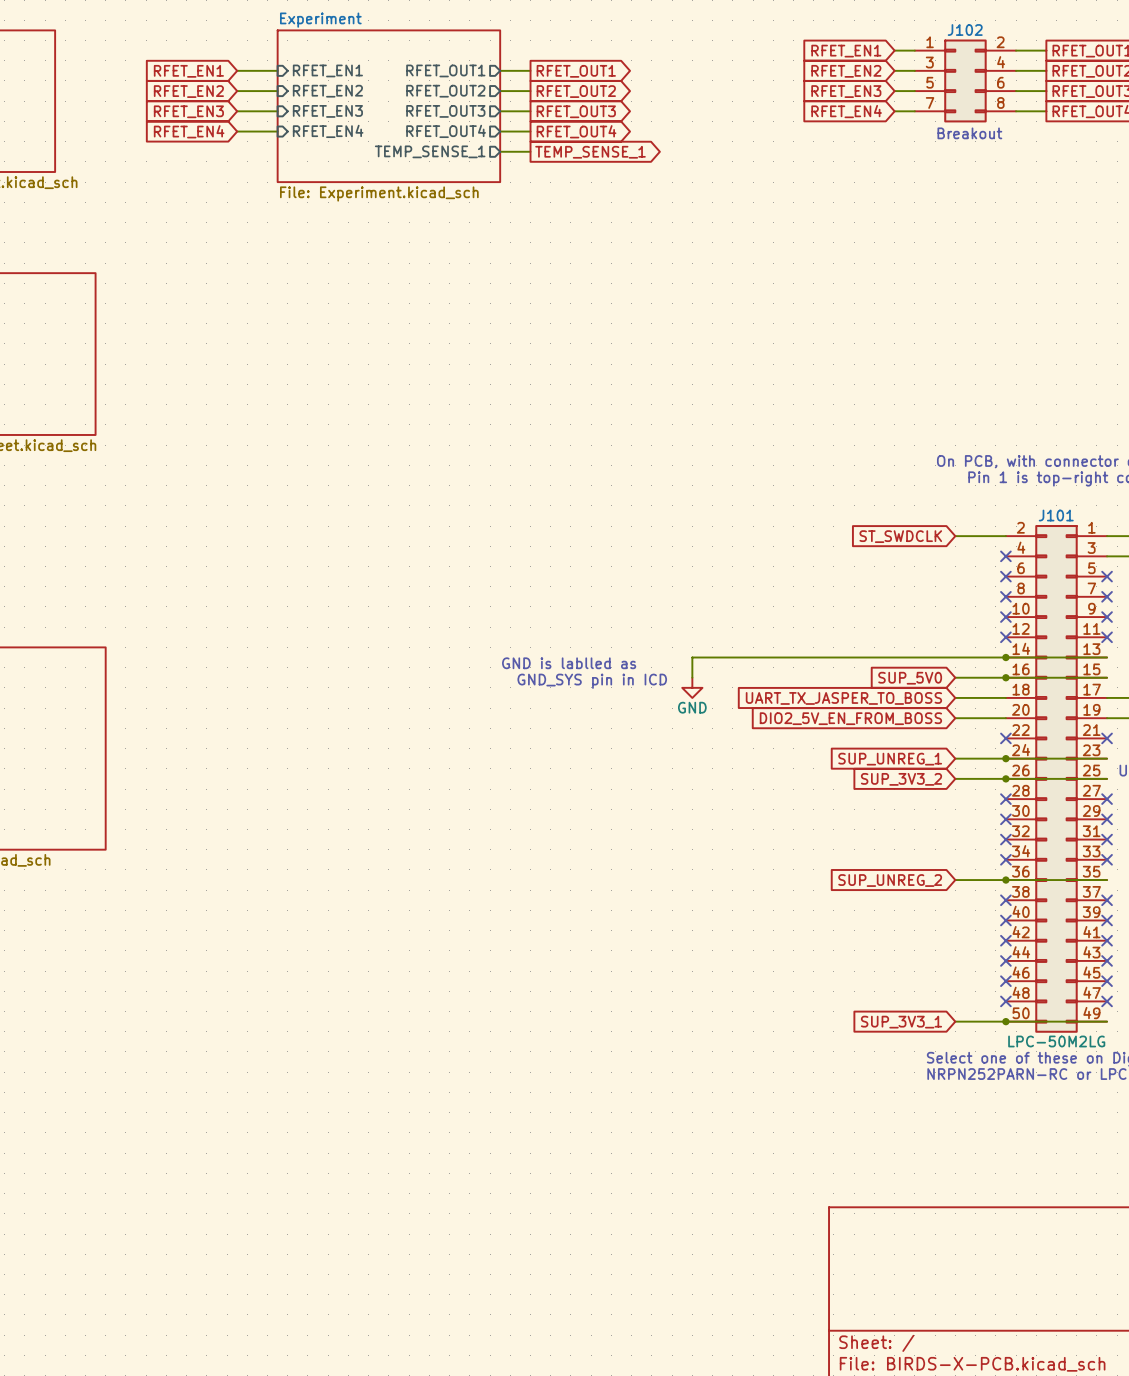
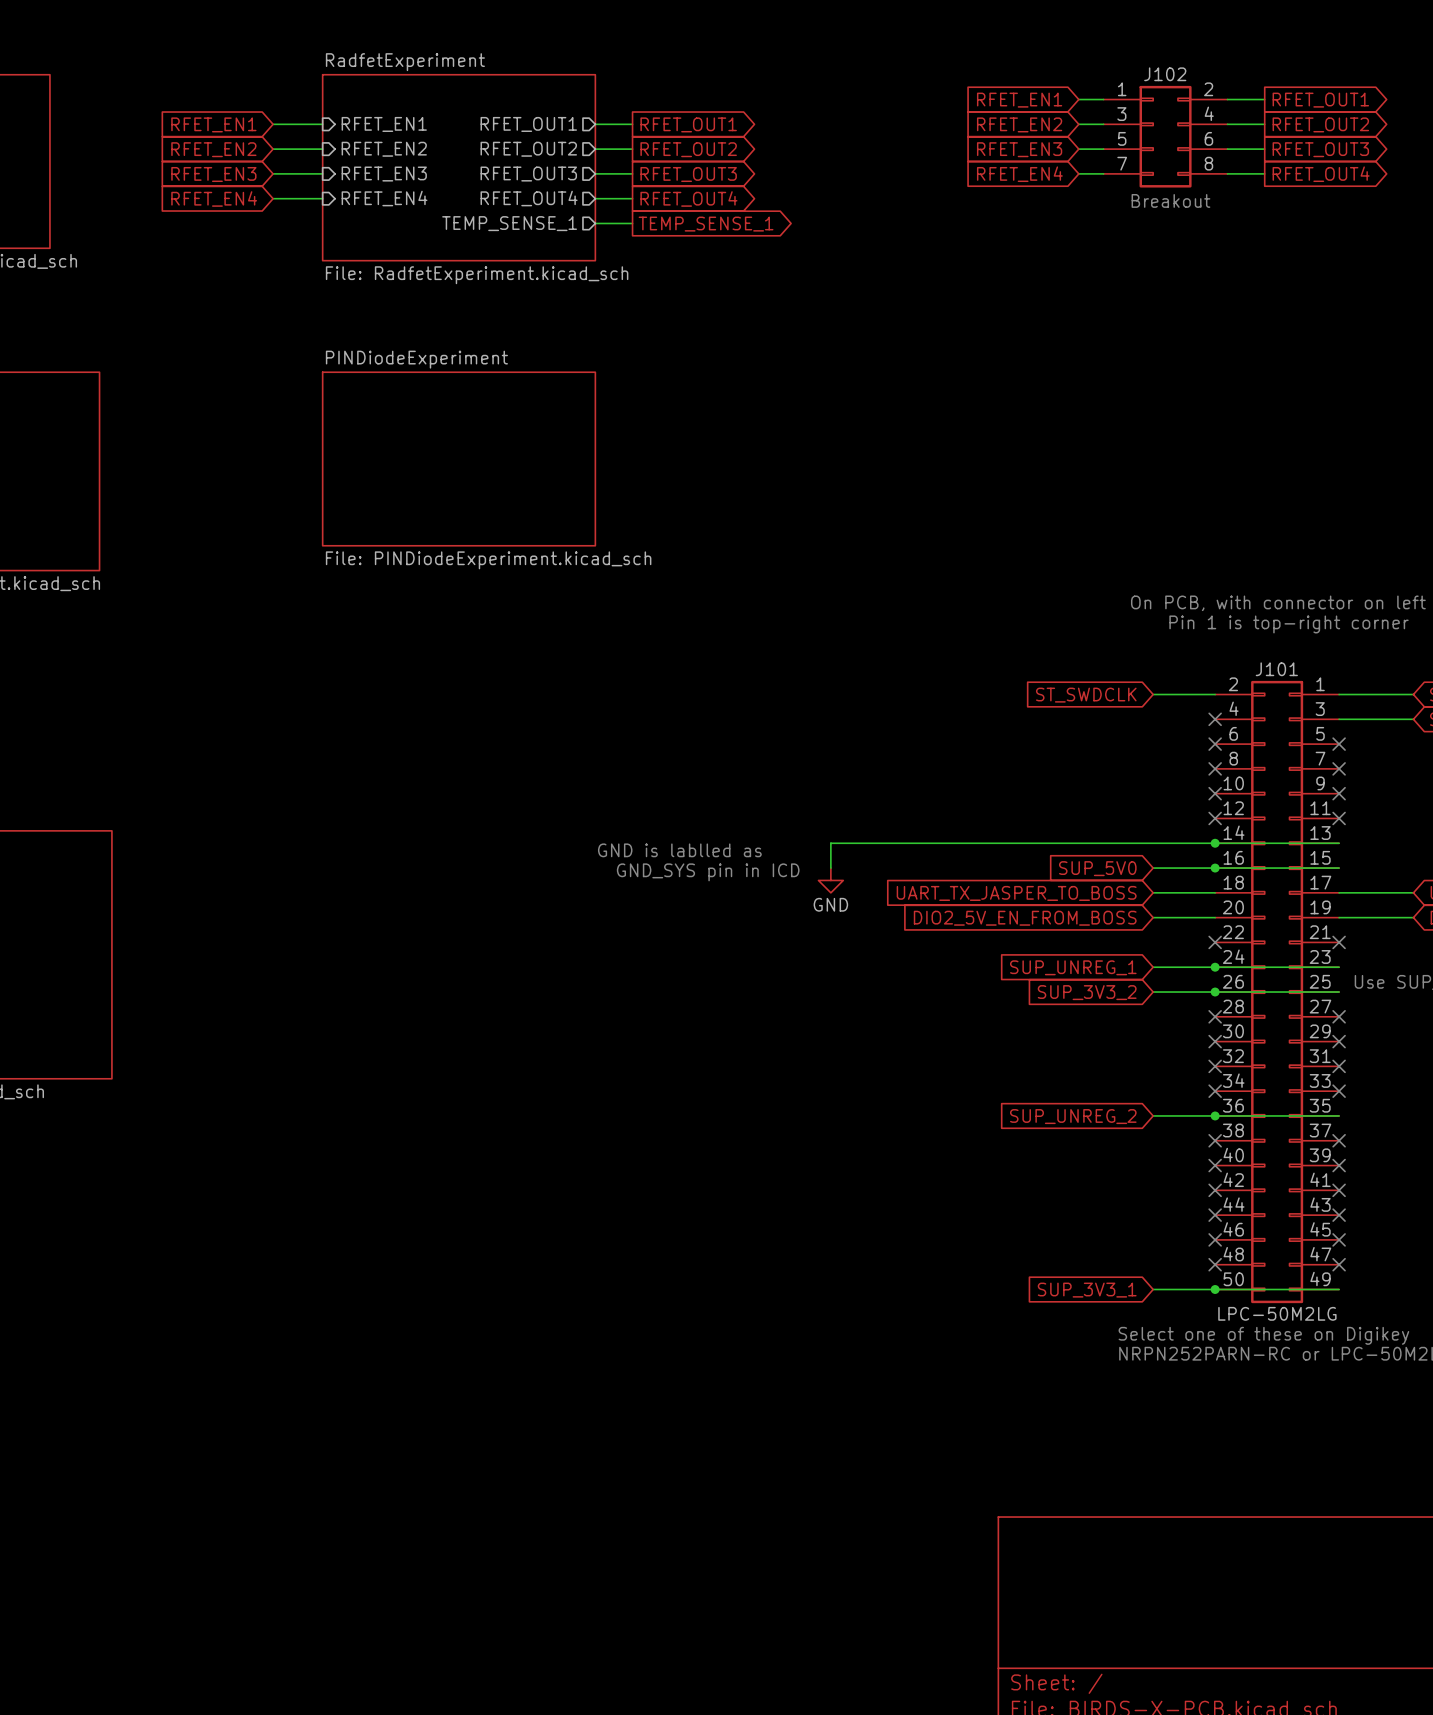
sheet Experiment name: Experiment (320, 20) -> RadfetExperiment (405, 62)
sheet Experiment value: File: Experiment.kicad_sch (379, 193) -> File: RadfetExperiment.kicad_sch (477, 275)
sheet PINDiodeExperiment: none -> File: PINDiodeExperiment.kicad_sch (459, 459)

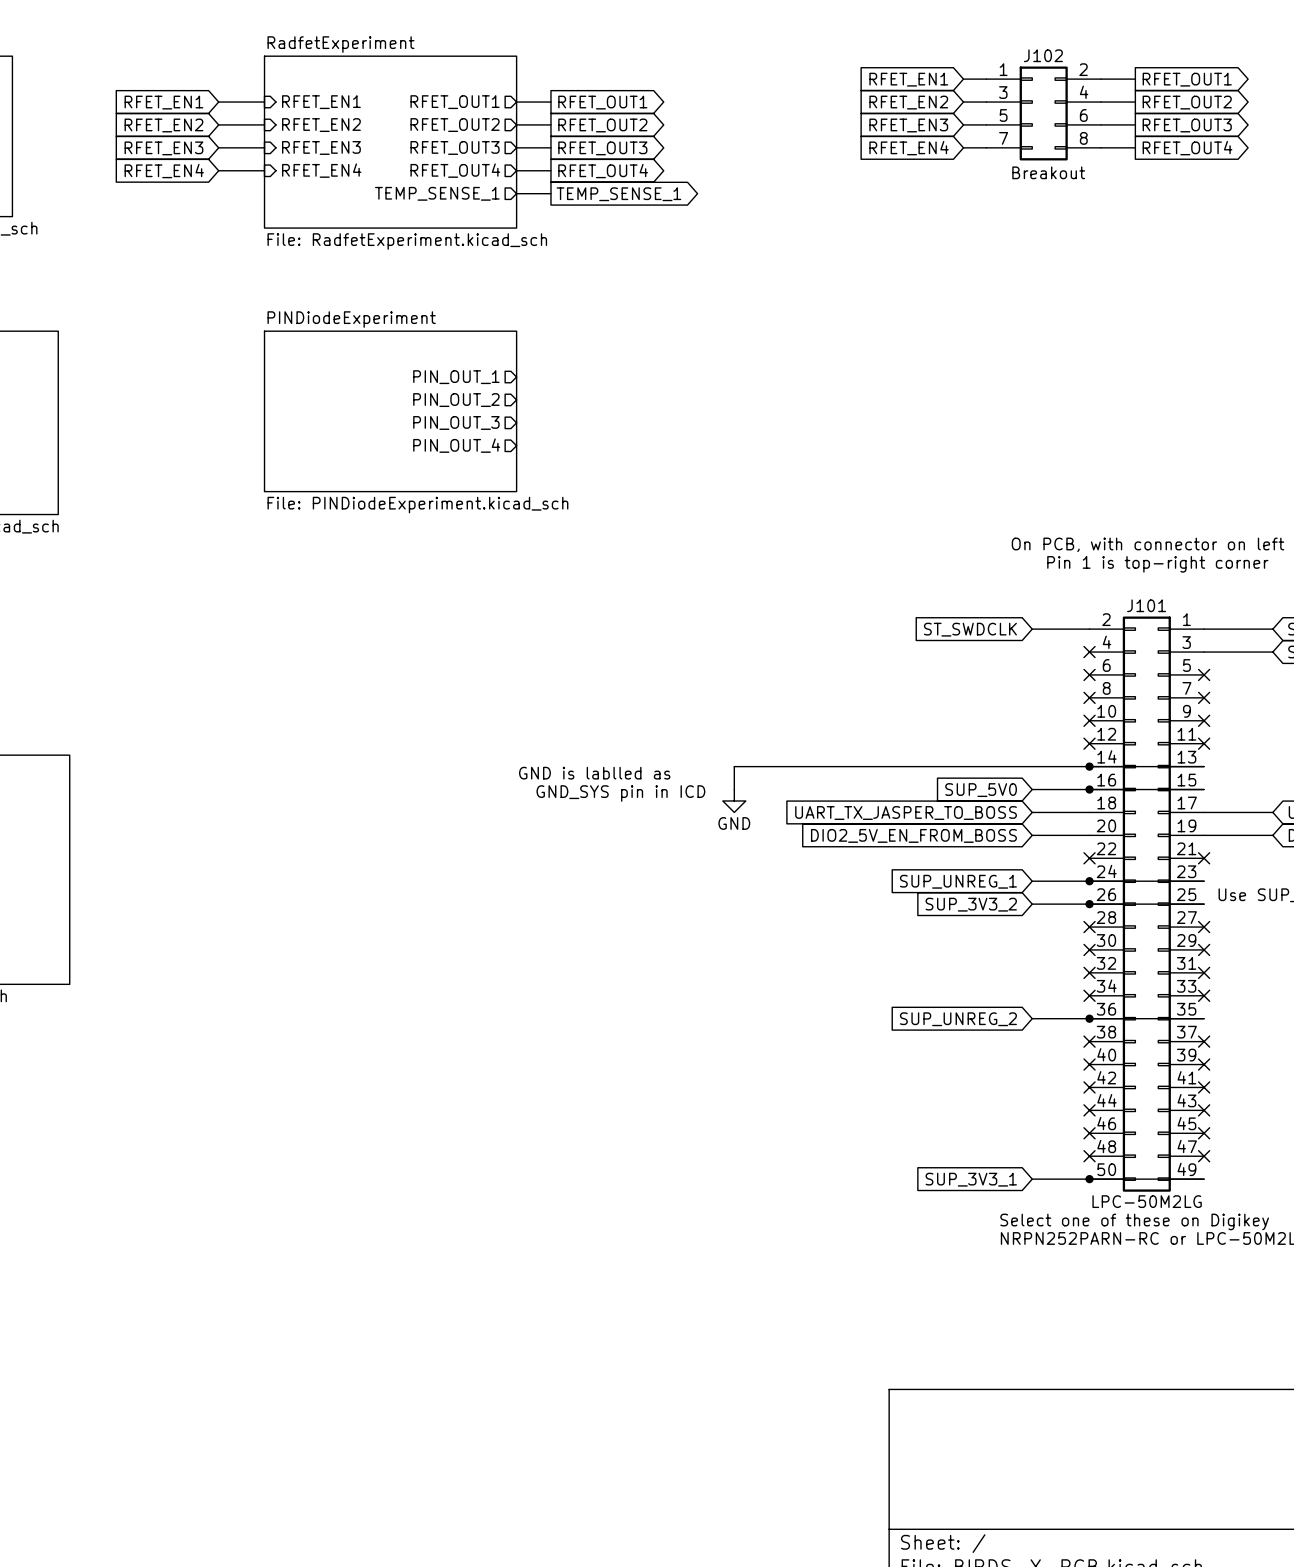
sheet pin: none -> PIN_OUT_1 (456, 377)
sheet pin: none -> PIN_OUT_2 (456, 400)
sheet pin: none -> PIN_OUT_3 (456, 422)
sheet pin: none -> PIN_OUT_4 (456, 445)

